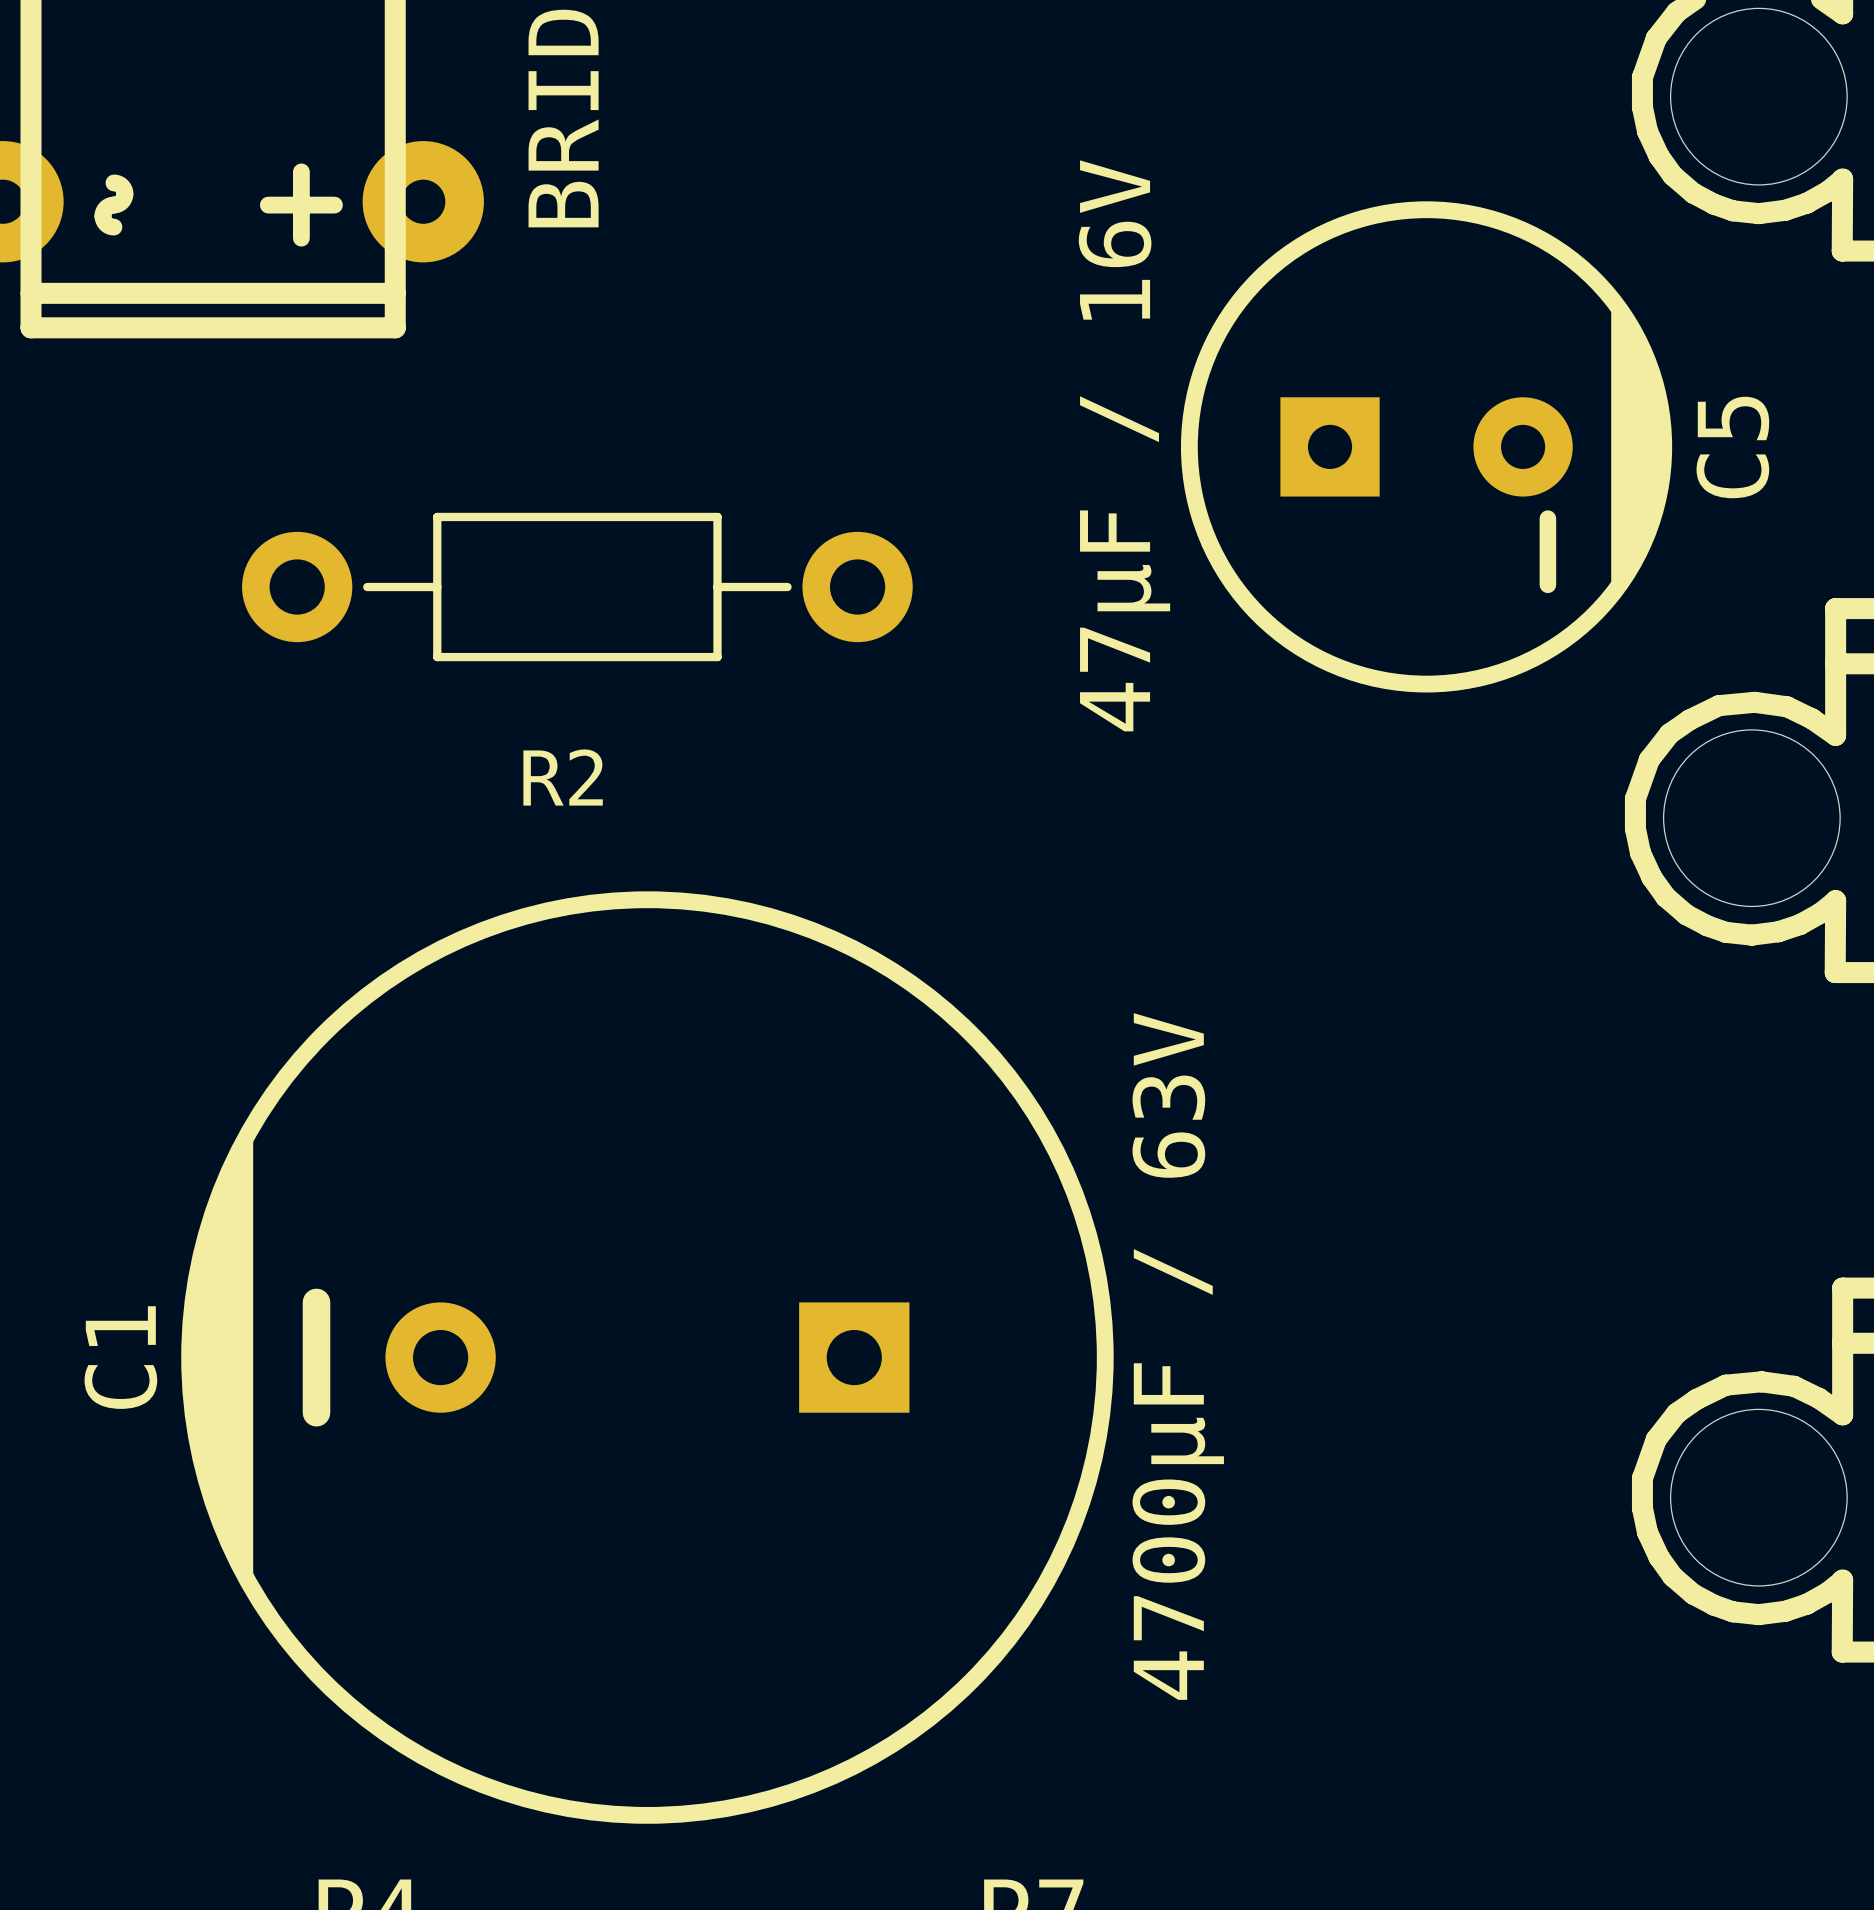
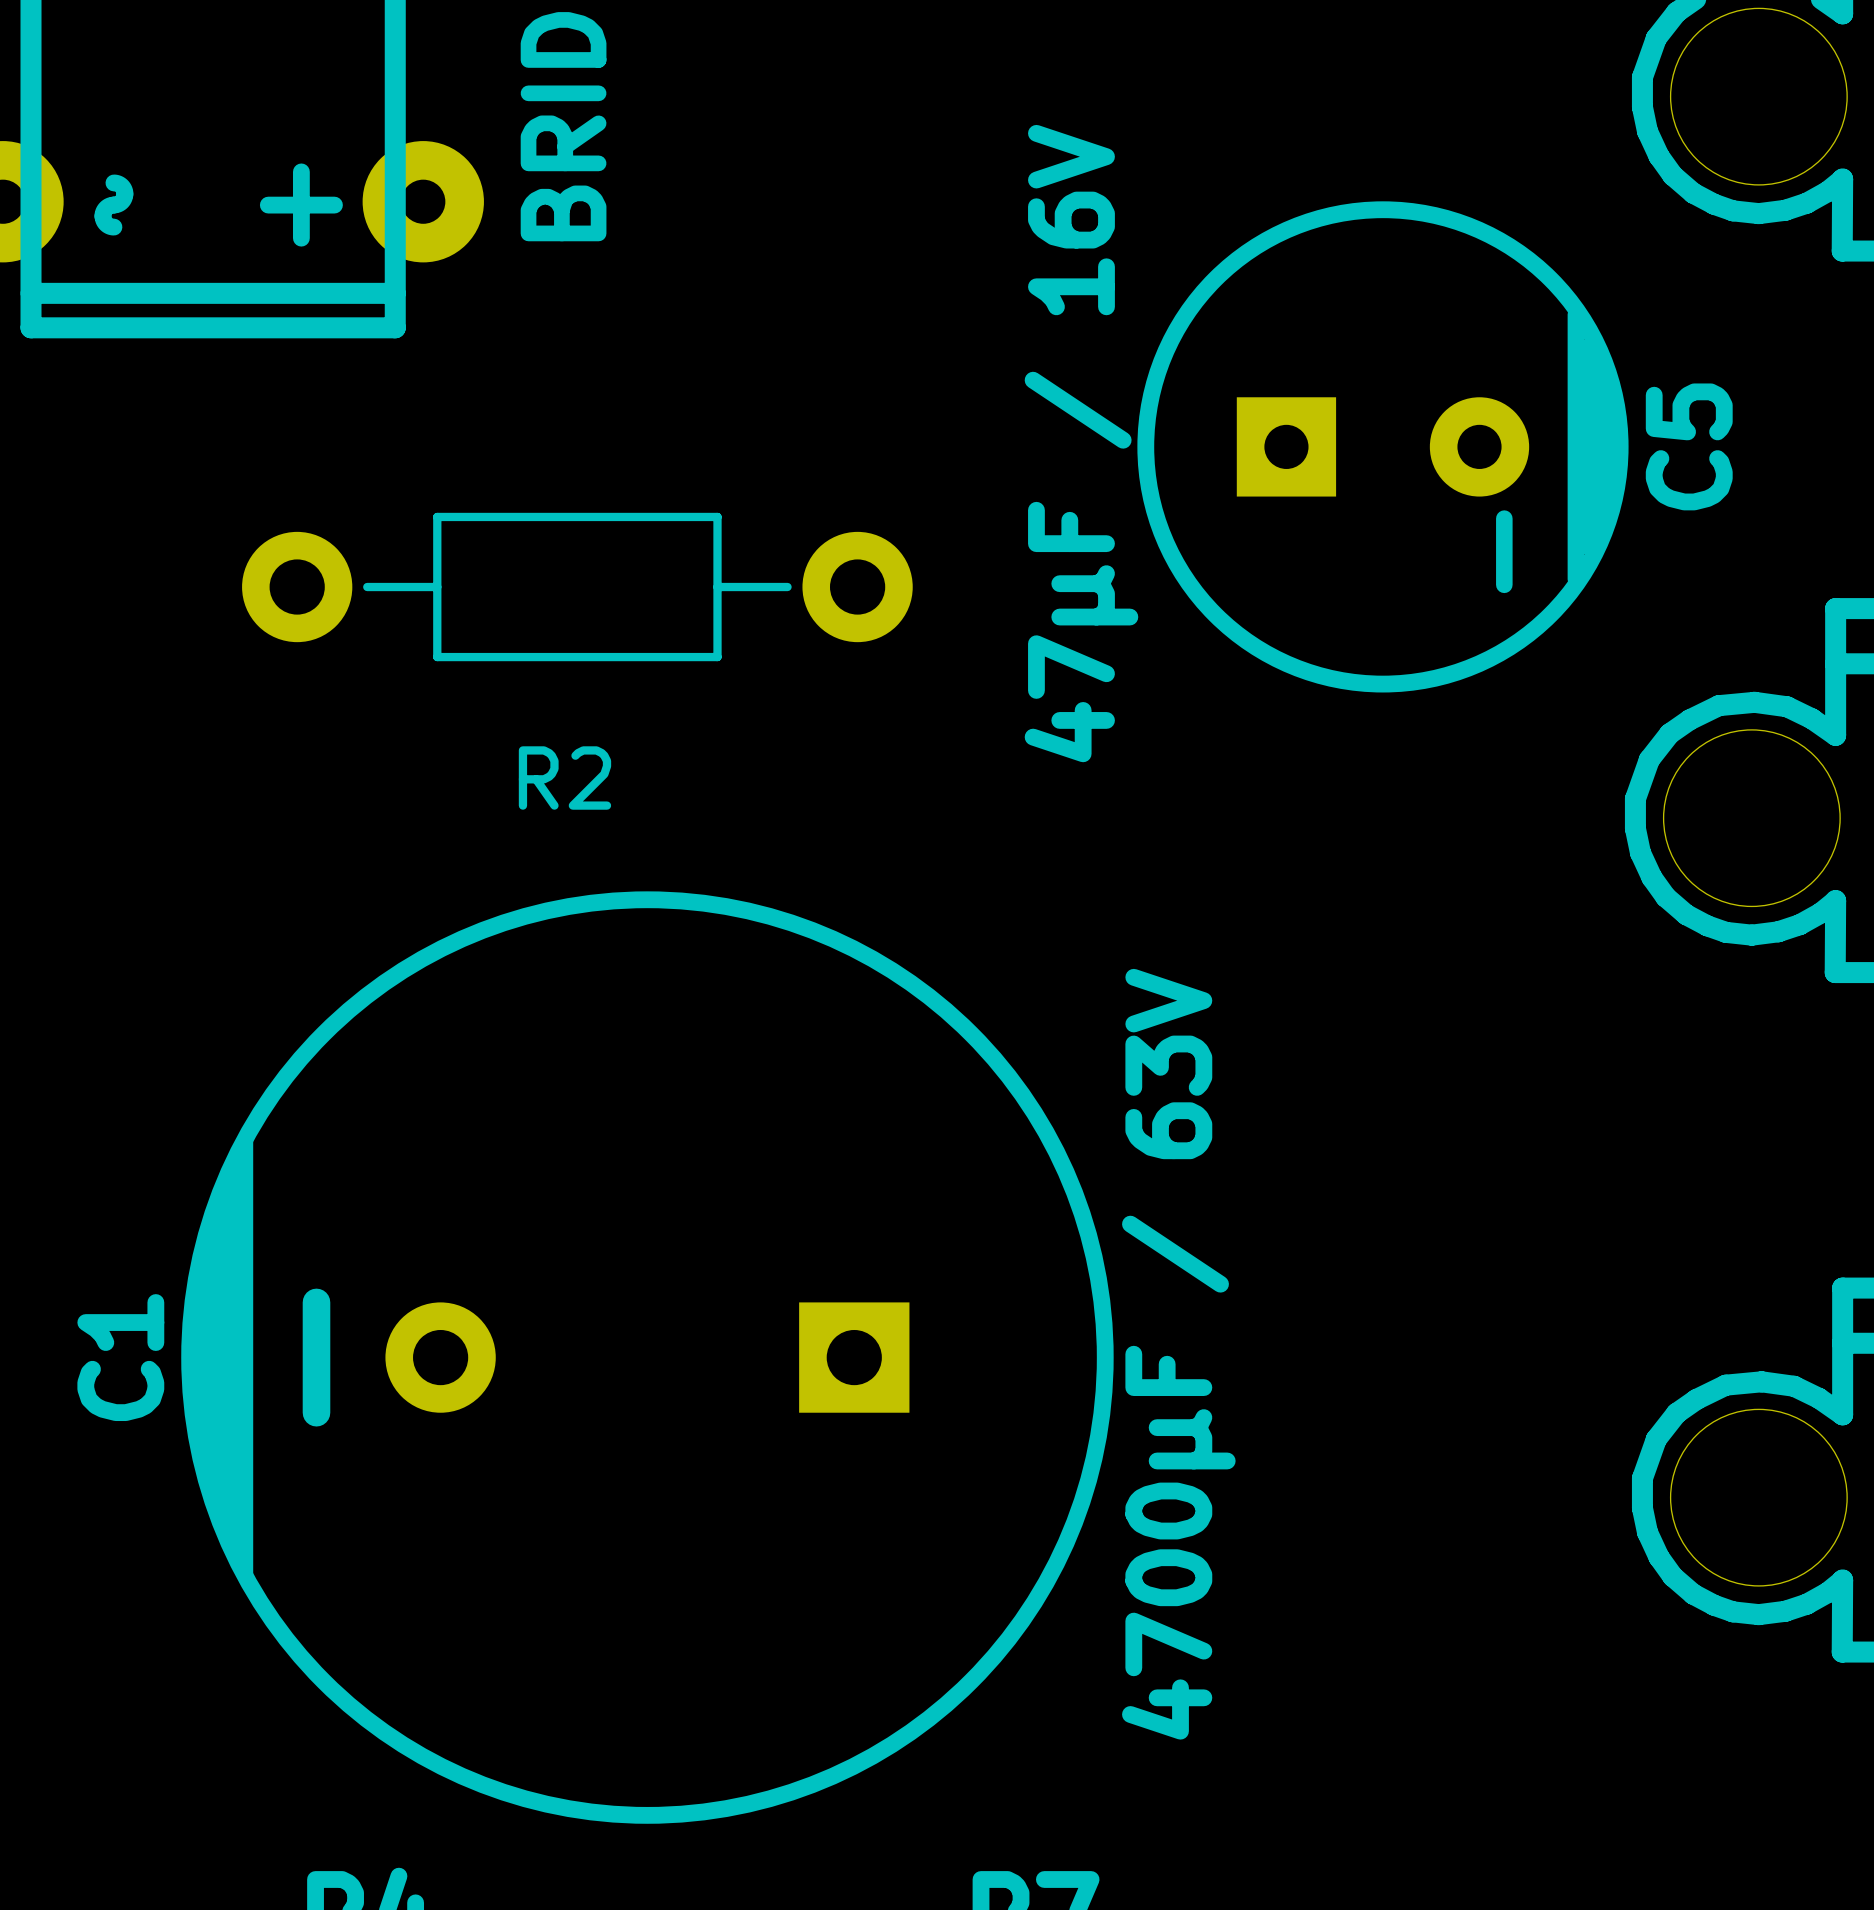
C5 position: (1426, 446) -> (1382, 446)

